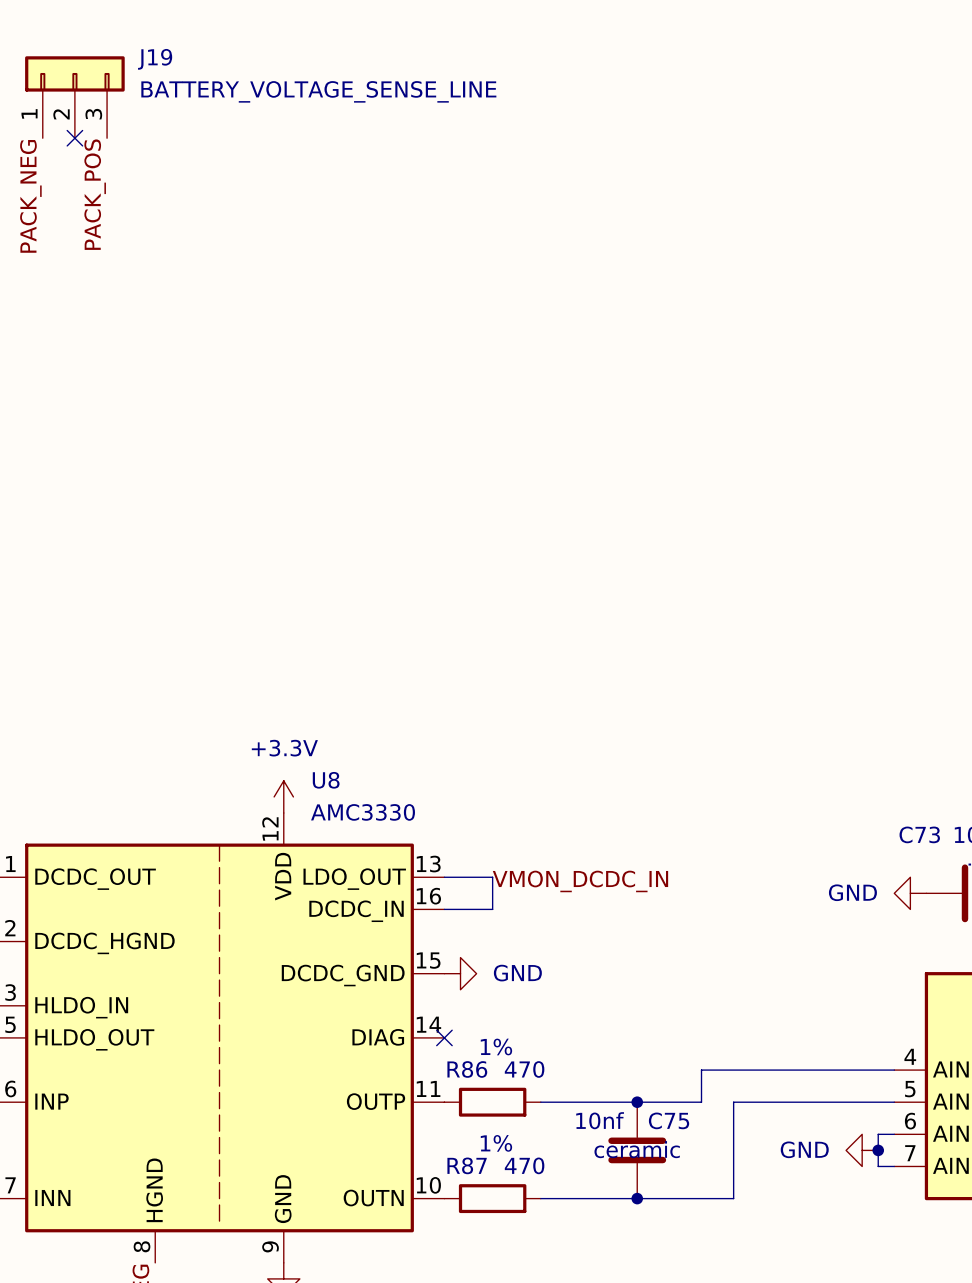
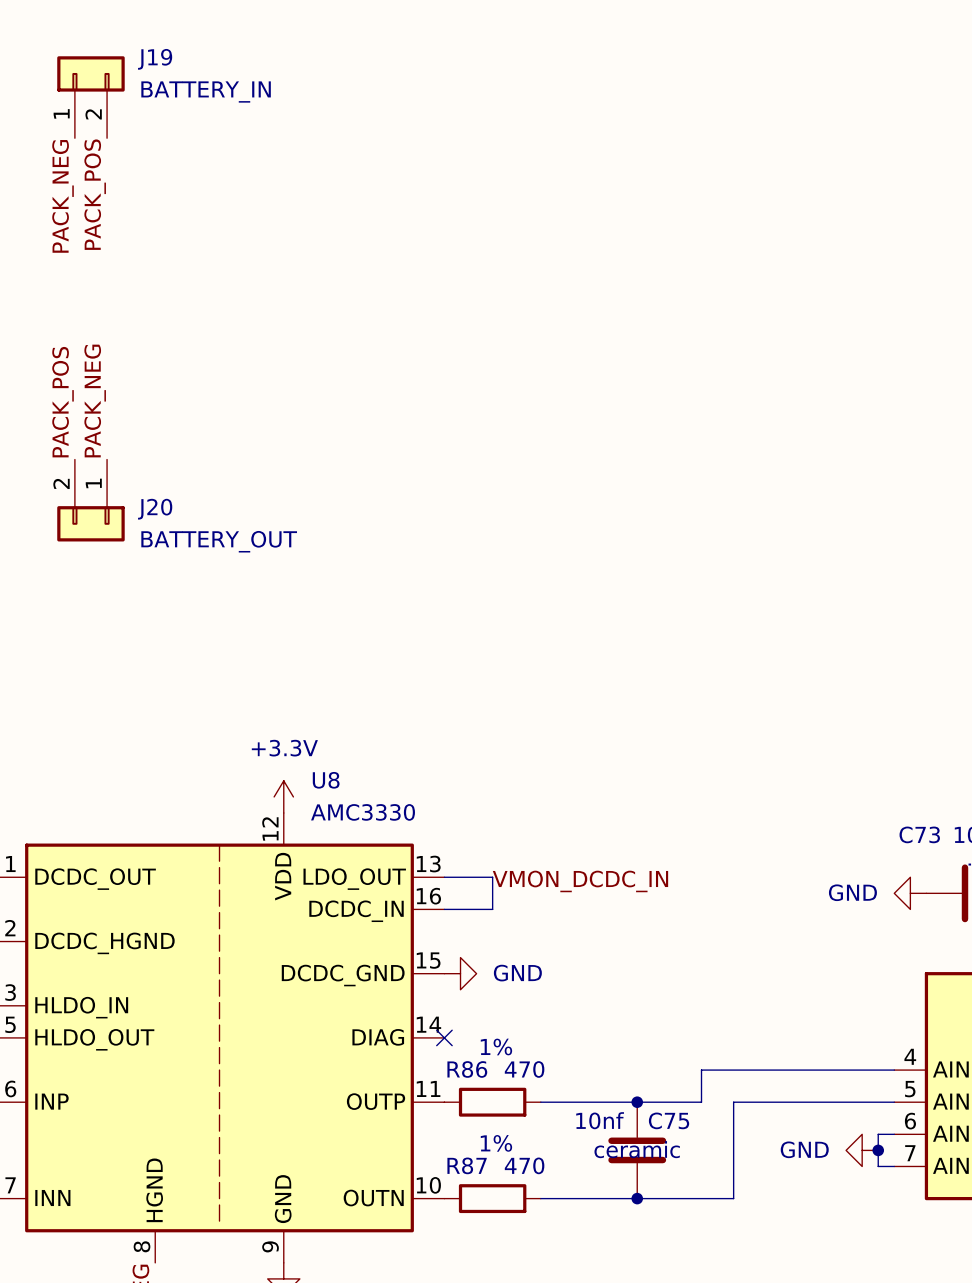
J19 symbol: [25, 56, 125, 139] -> [57, 56, 125, 139]
J19 value: BATTERY_VOLTAGE_SENSE_LINE (318, 91) -> BATTERY_IN (206, 92)
no-connect mark: (74, 138) -> none
label position: PACK_NEG (30, 196) -> PACK_NEG (63, 196)
label: none -> PACK_NEG (95, 401)
label: none -> PACK_POS (63, 402)
J20: none -> BATTERY_OUT (90, 500)

